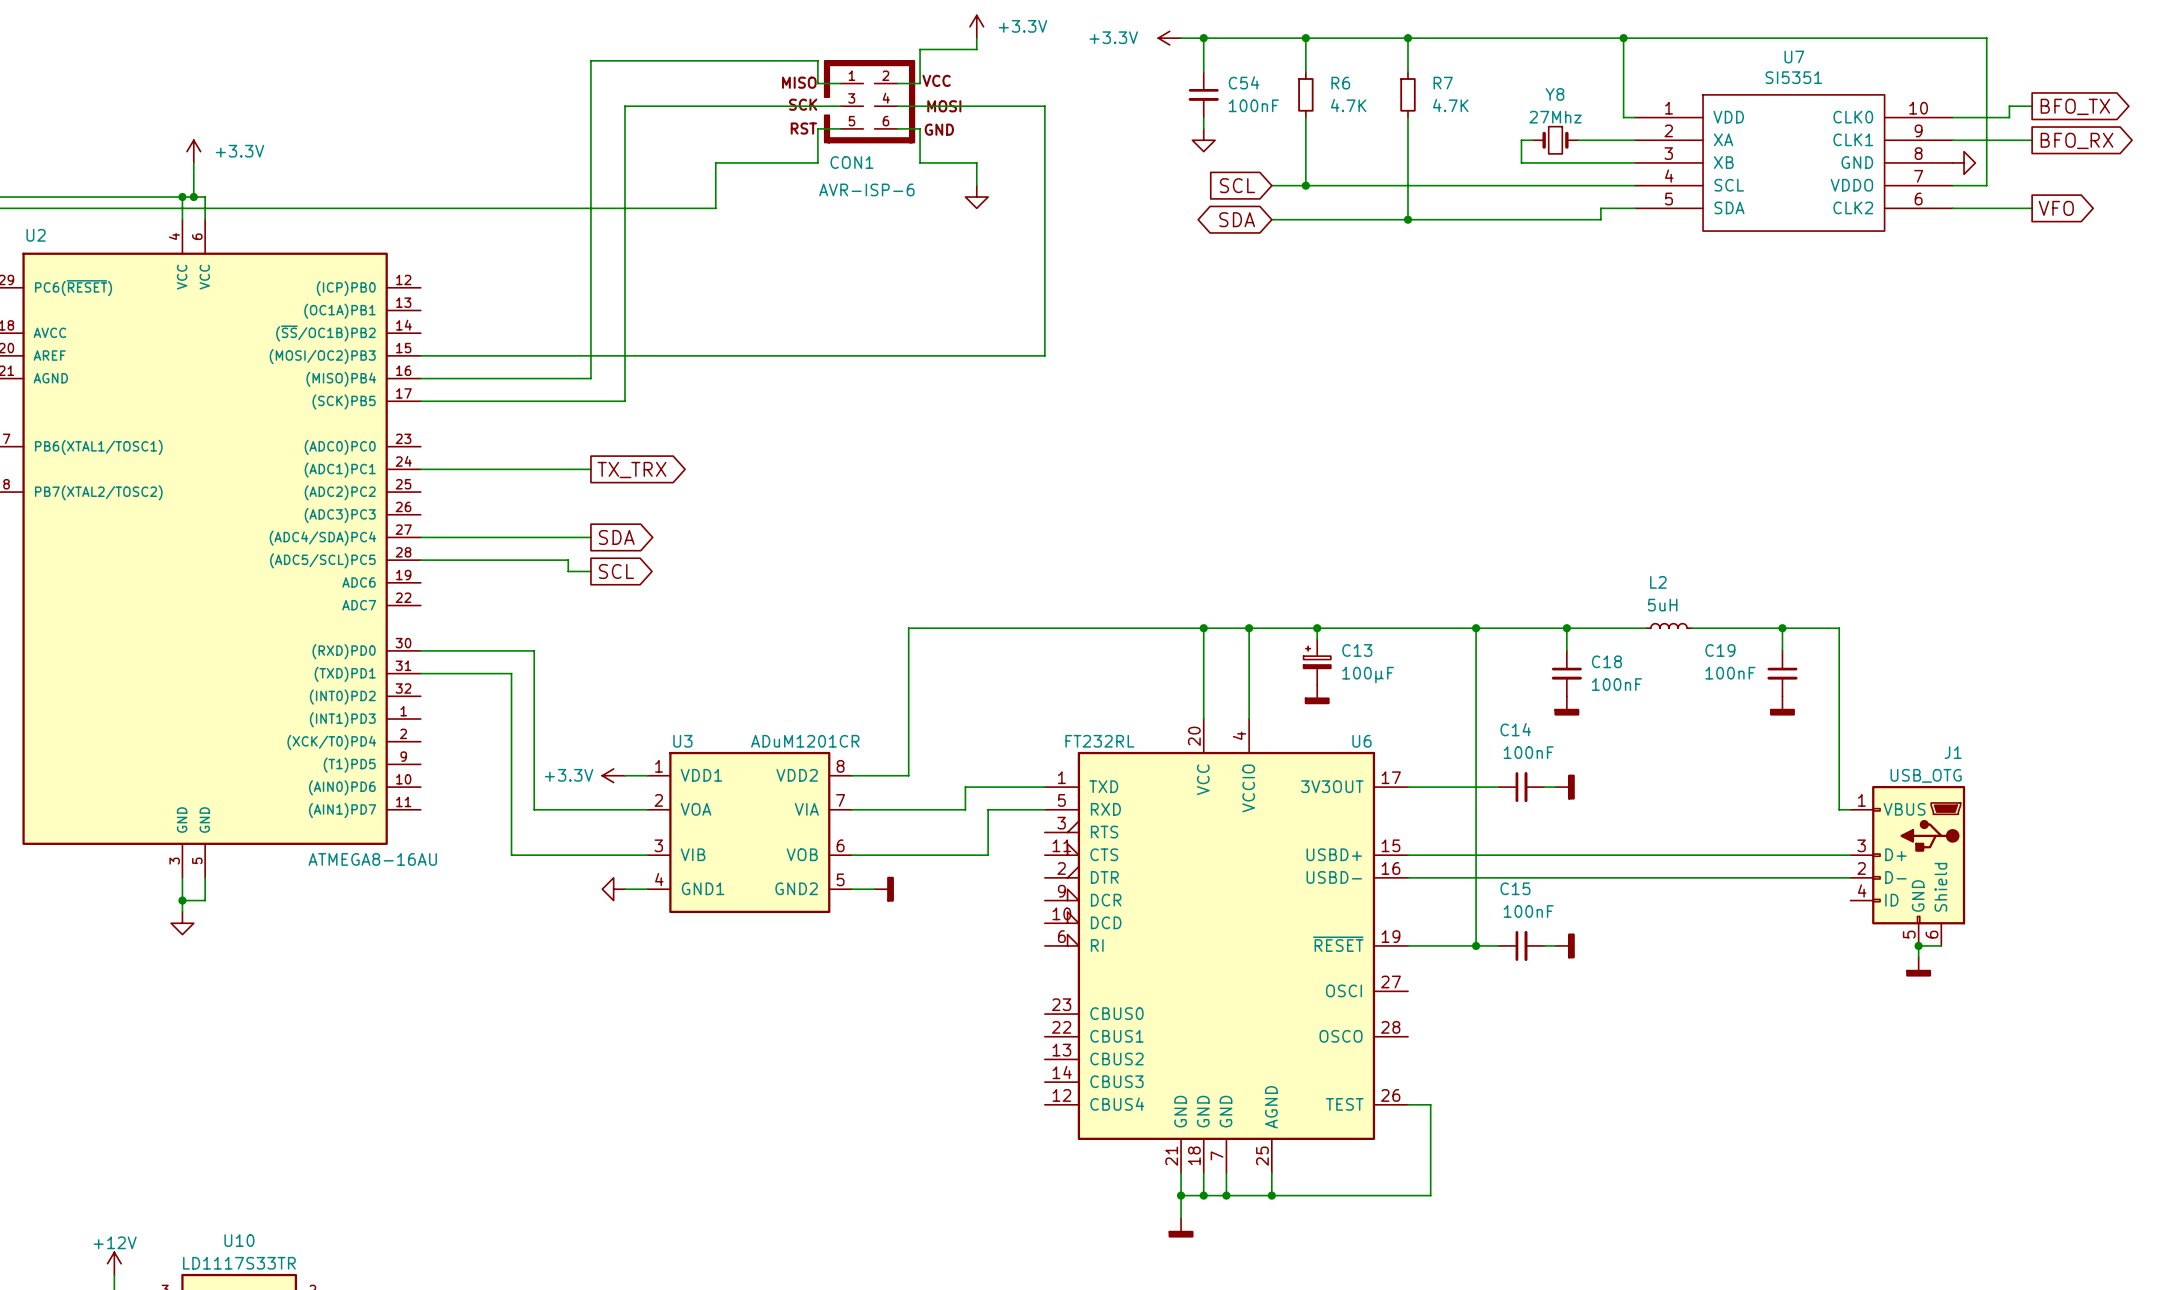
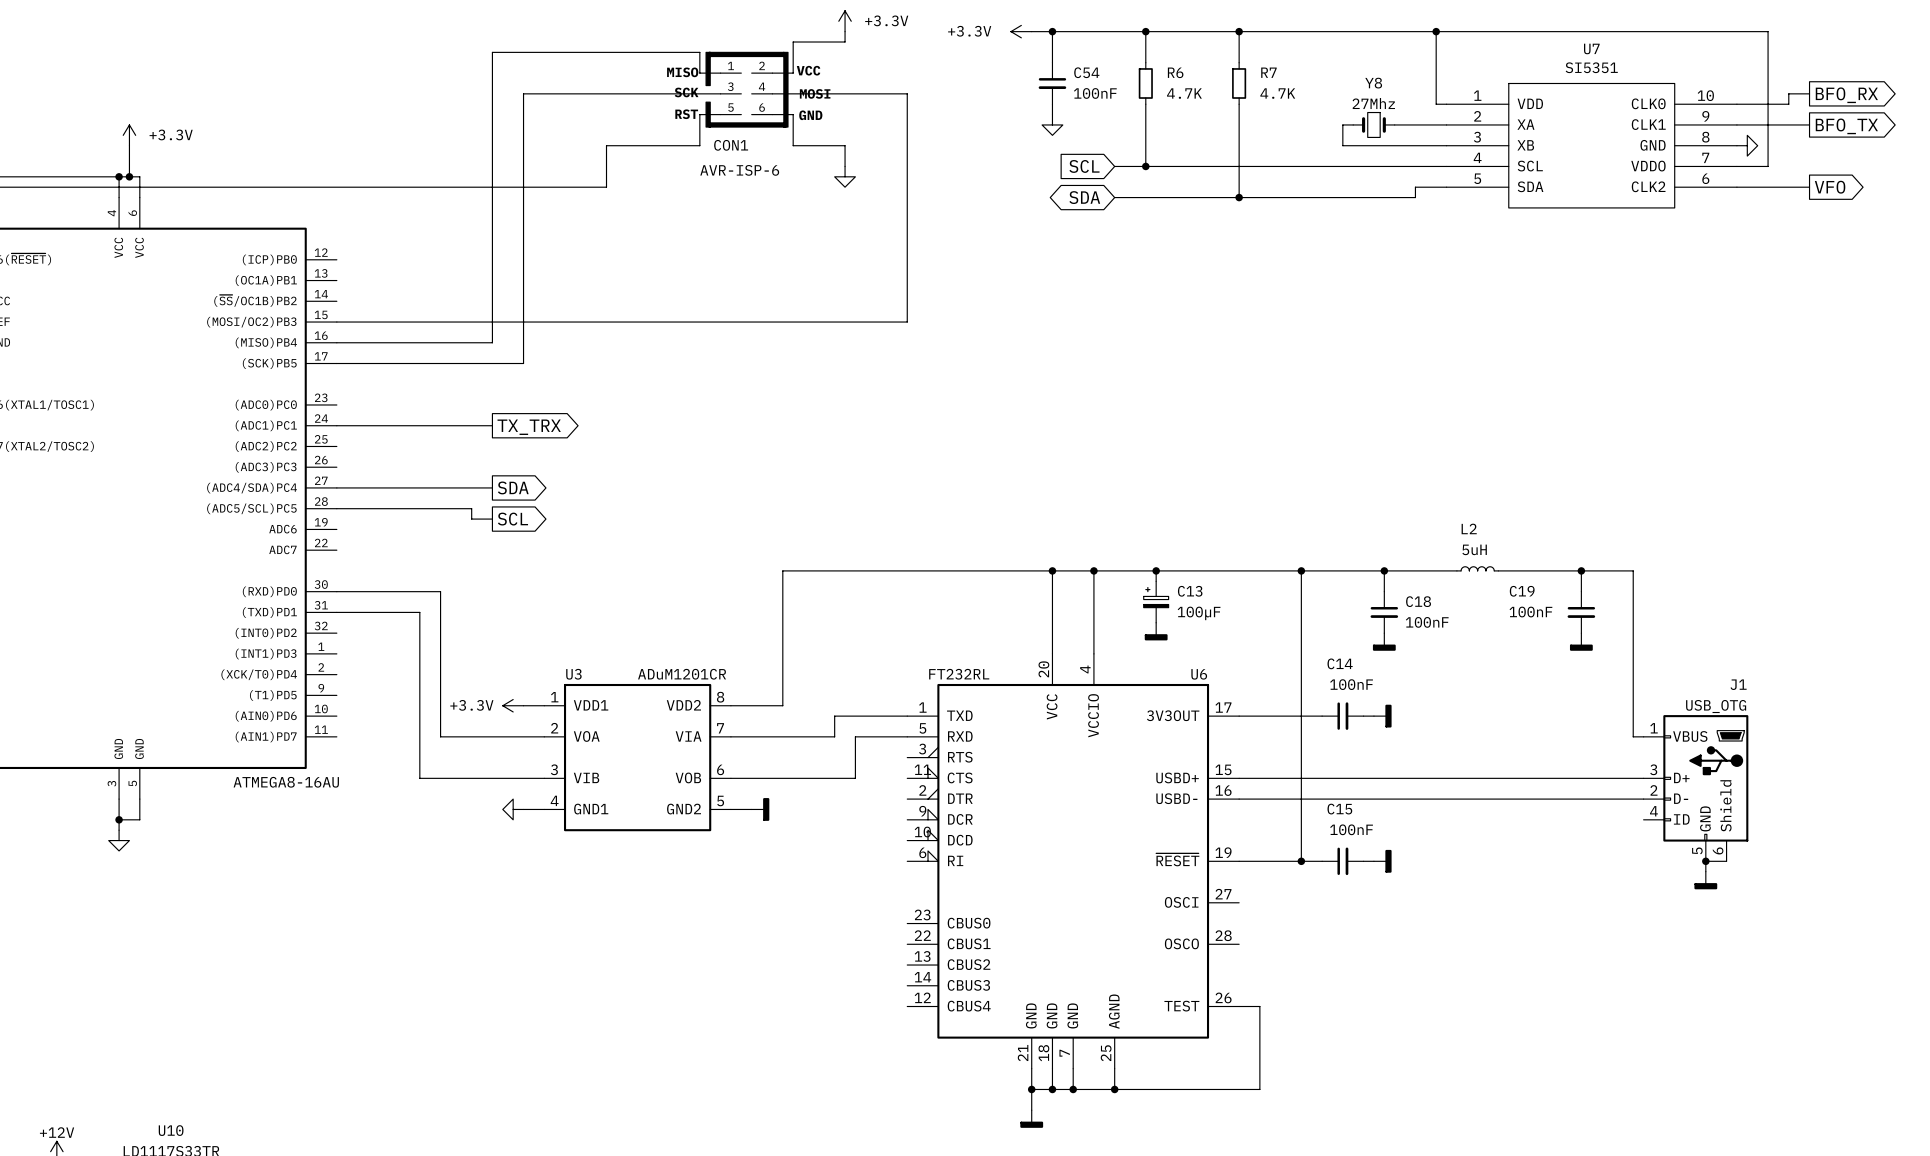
global label: BFO_TX (2075, 106) -> BFO_RX (1846, 95)
global label: BFO_RX (2077, 140) -> BFO_TX (1846, 126)

